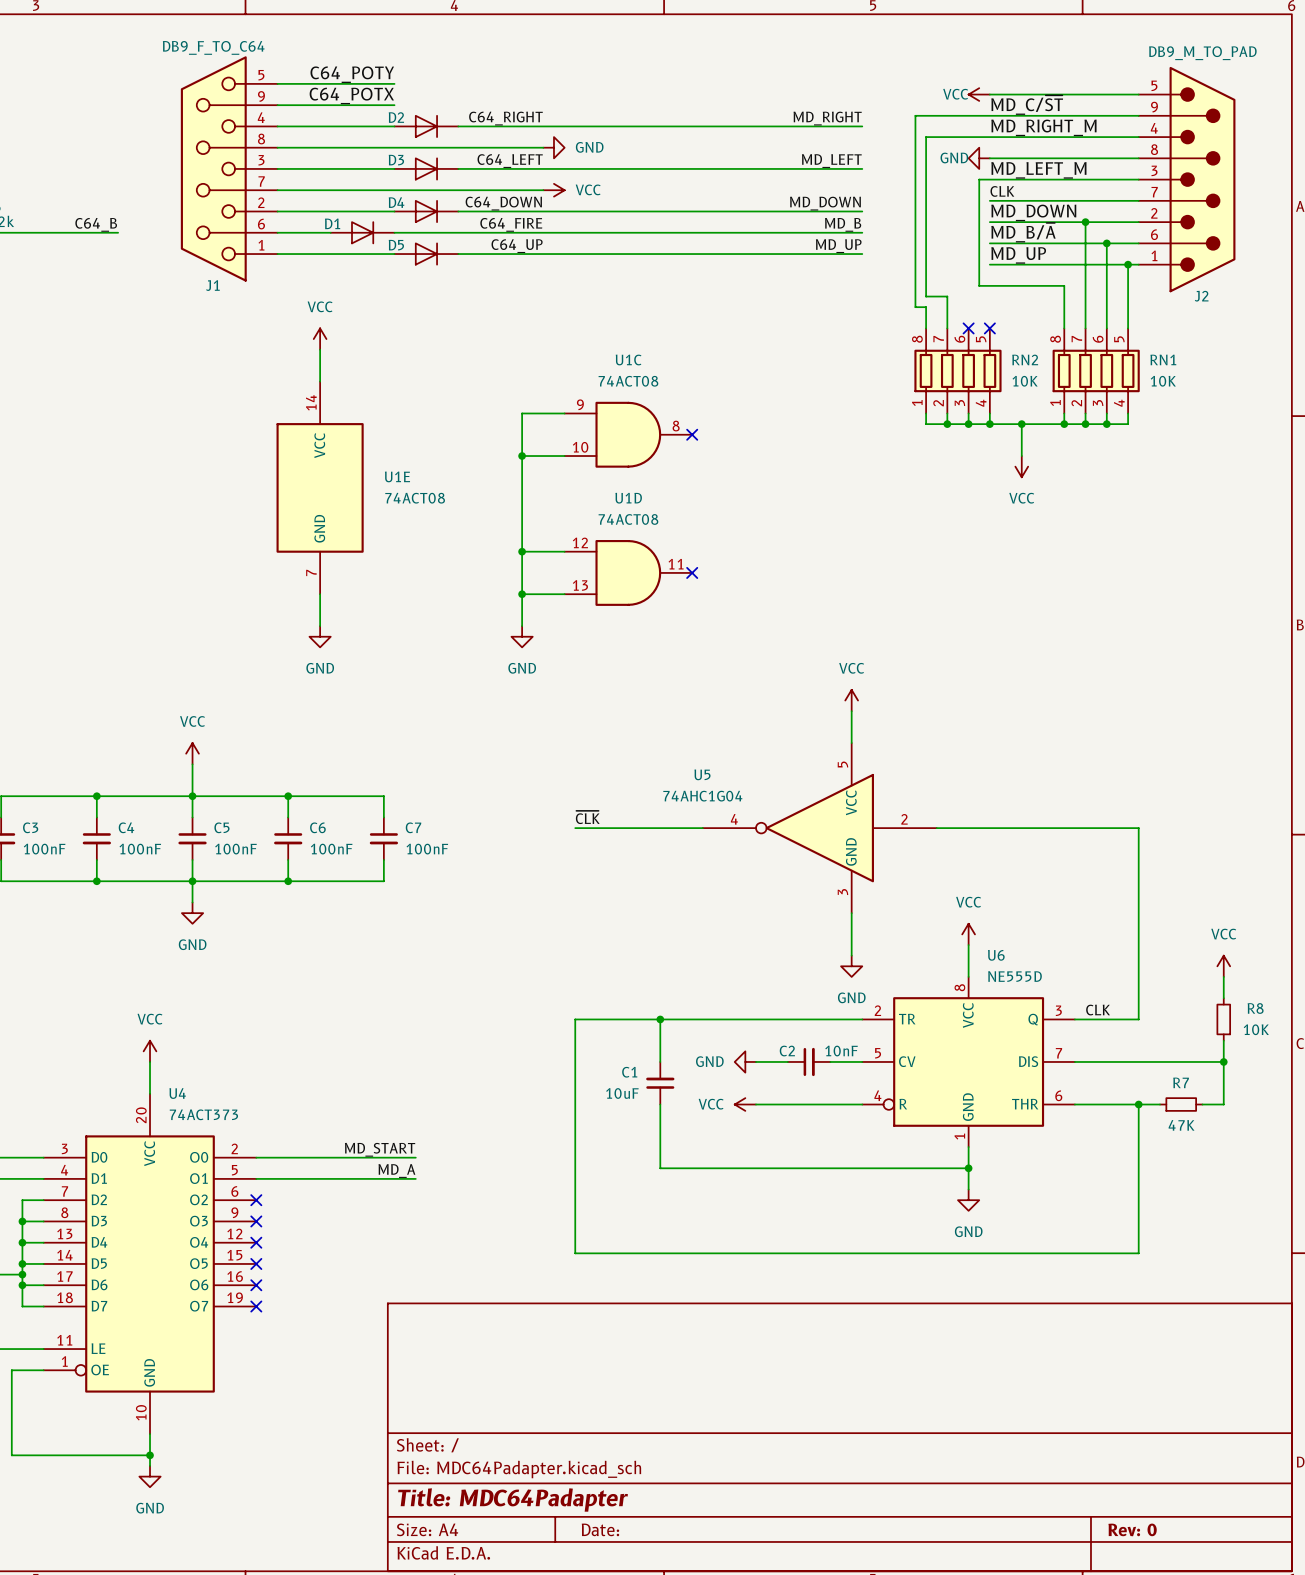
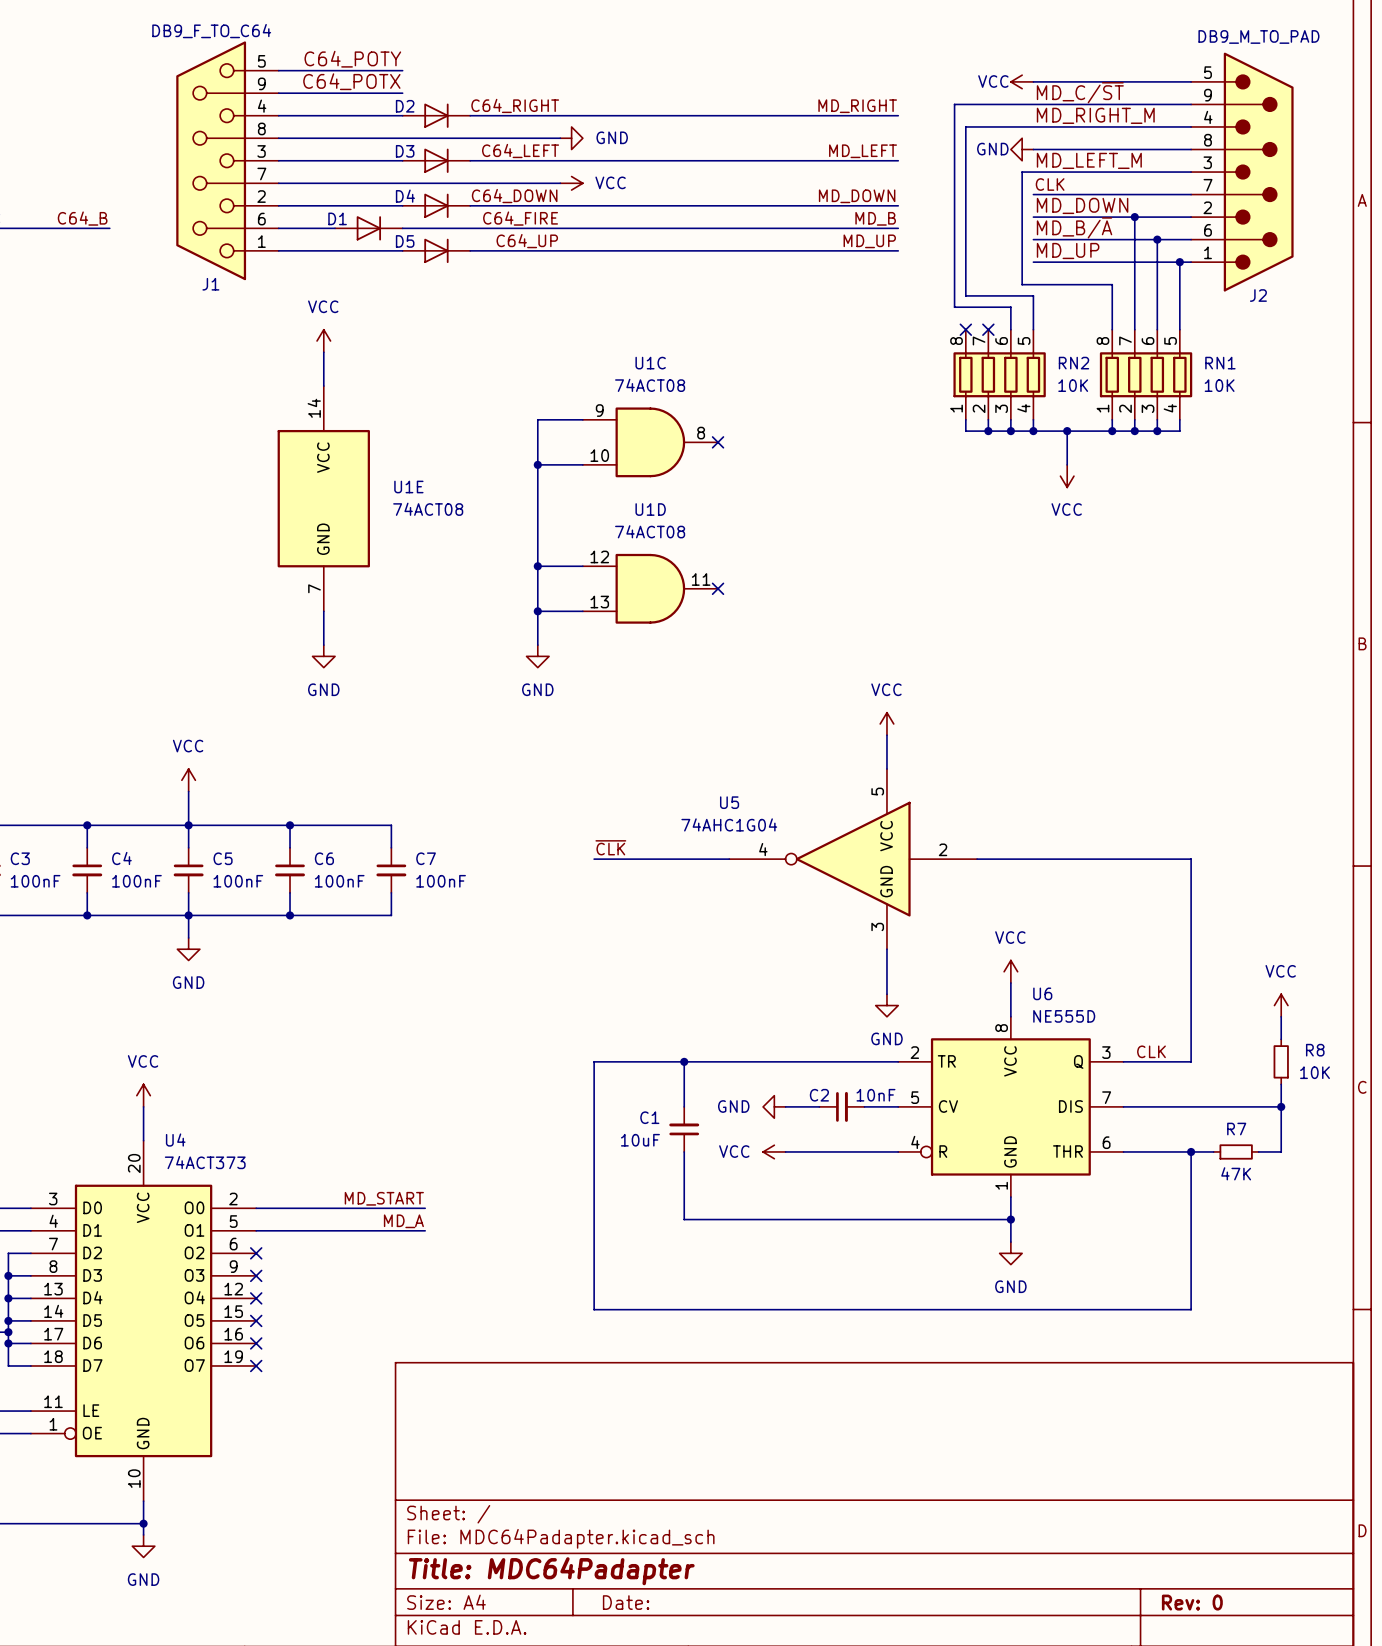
wire: (947, 296) (947, 328) -> (988, 295) (1033, 295) (1033, 329)
wire: (926, 307) (926, 328) -> (965, 307) (1010, 307) (1010, 329)
no-connect mark: none -> (965, 329)
no-connect mark: none -> (988, 329)
no-connect mark: (968, 328) -> none
no-connect mark: (989, 328) -> none

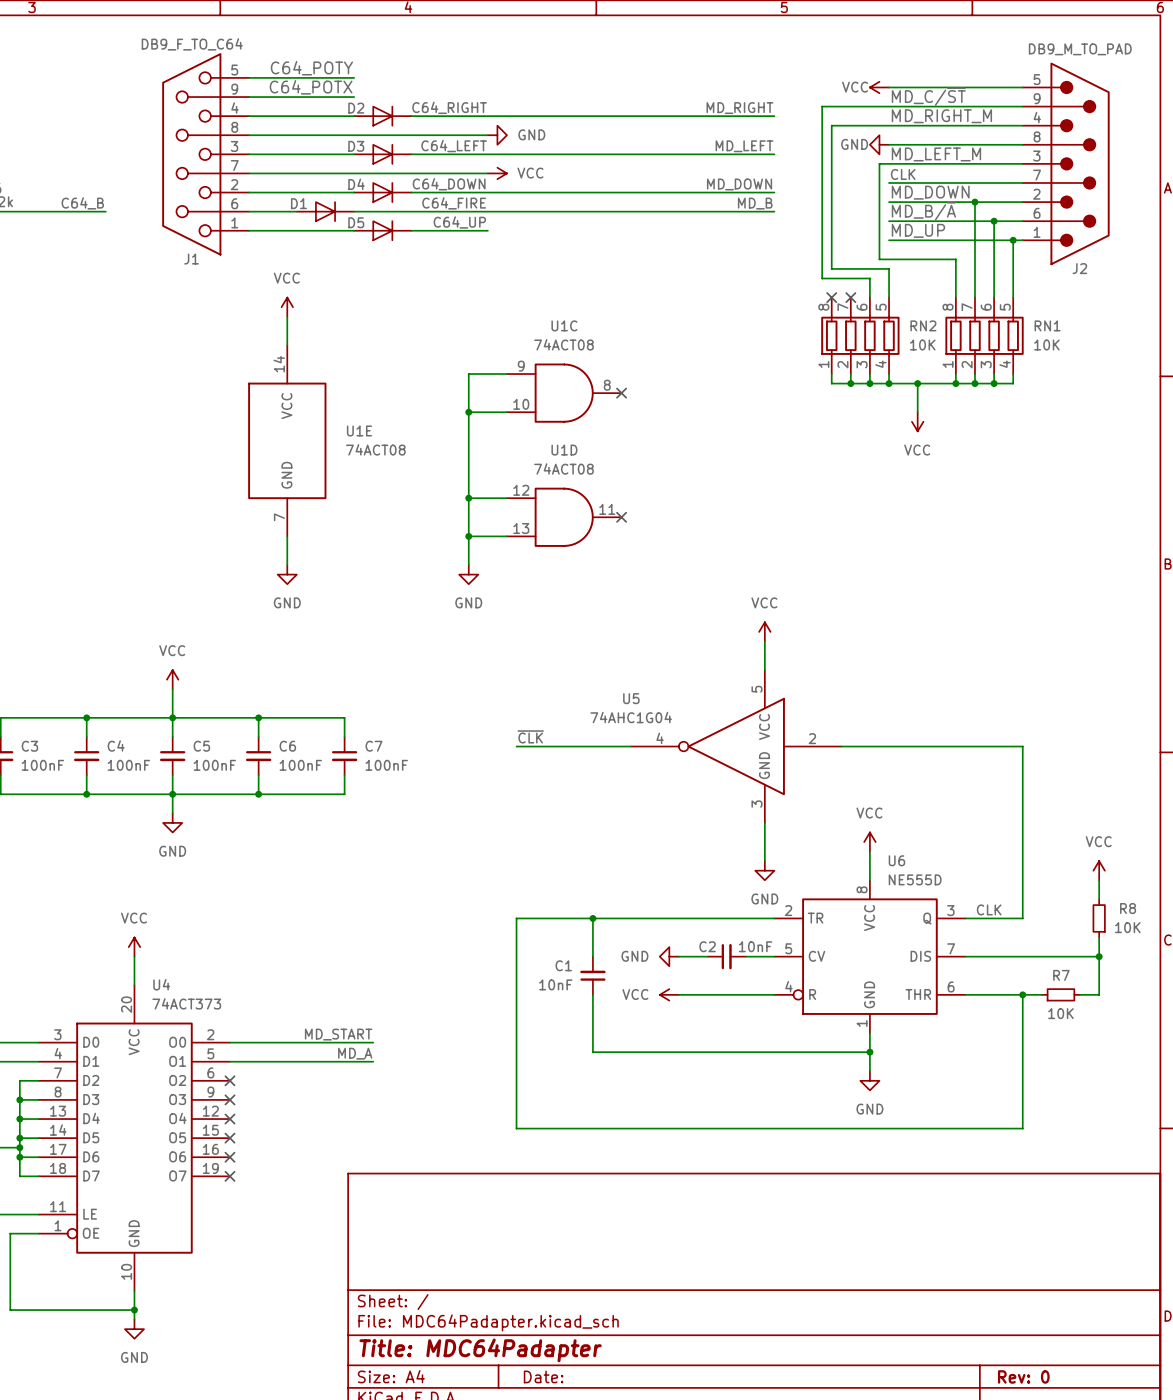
label: MD_UP (869, 241) -> none
wire: (560, 250) (898, 250) -> none
C1 value: 10uF (640, 1140) -> 10nF (555, 984)
R7 value: 47K (1236, 1173) -> 10K (1060, 1013)

